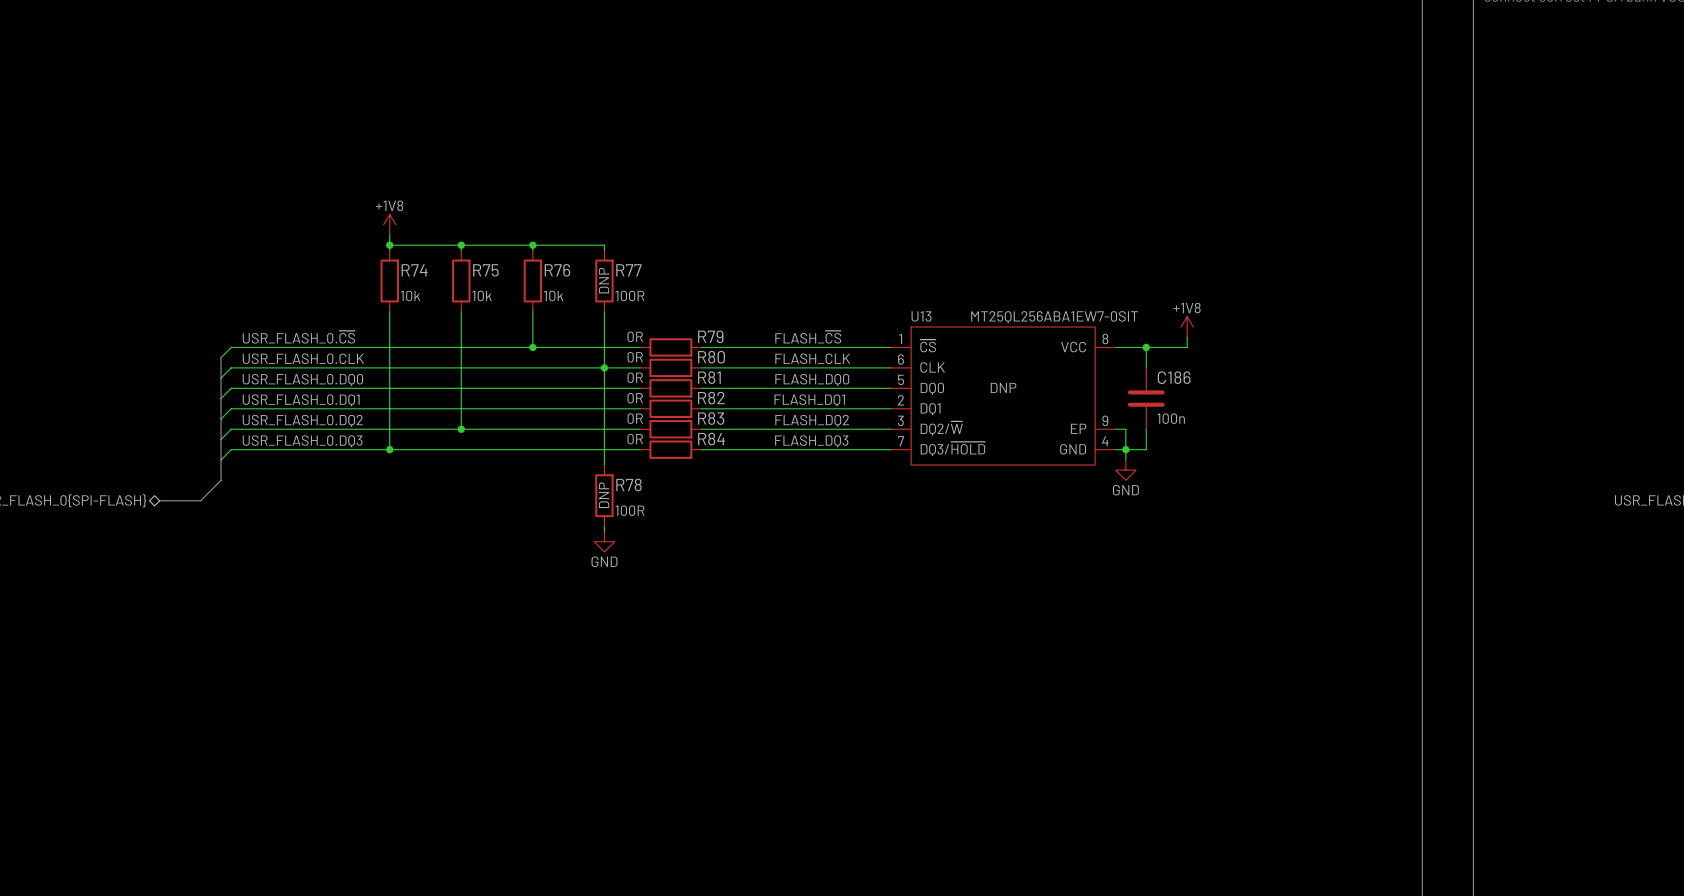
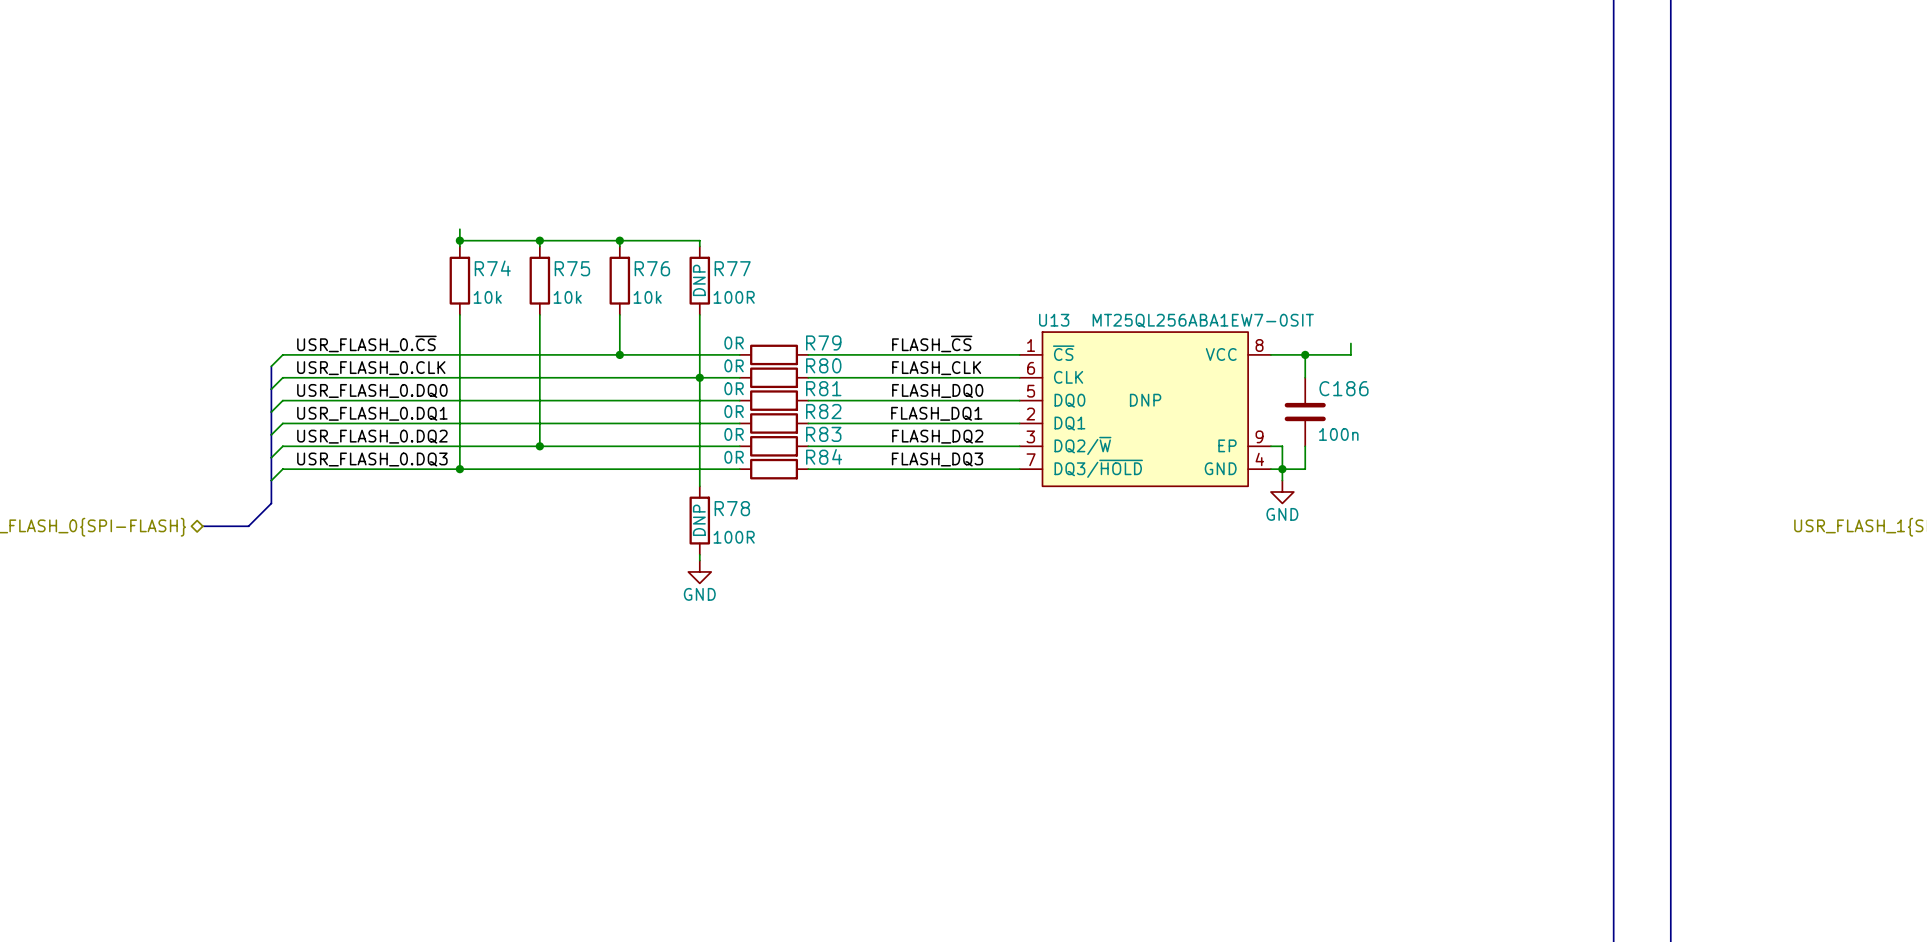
power symbol: +1V8 (389, 224) -> none
power symbol: +1V8 (1187, 327) -> none

